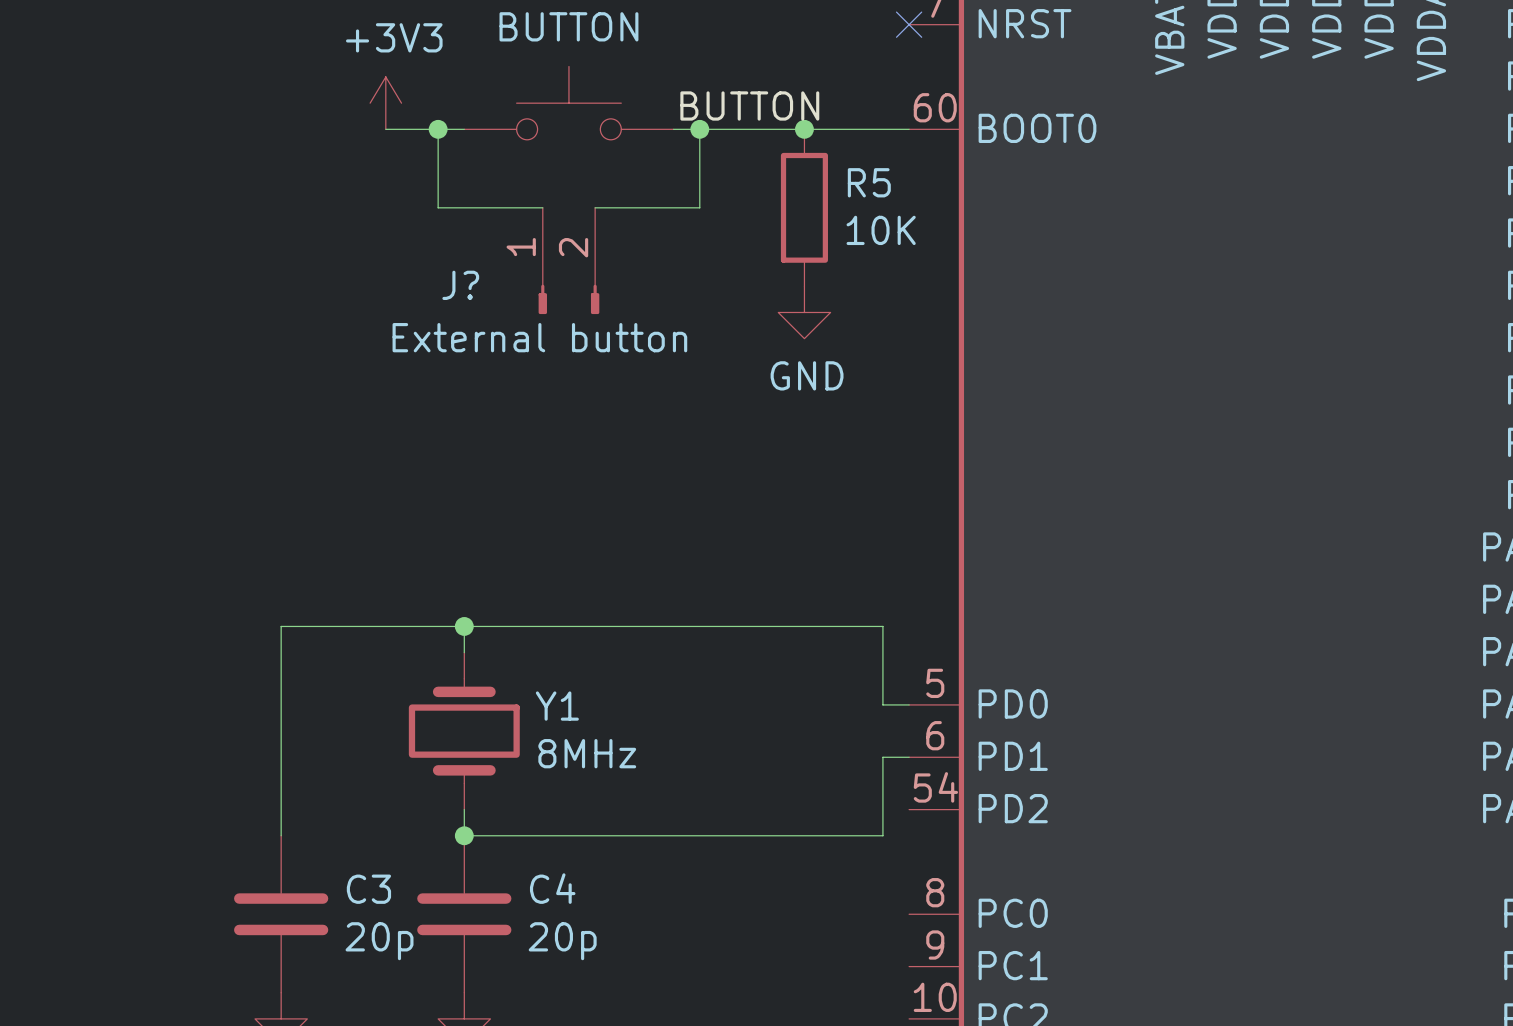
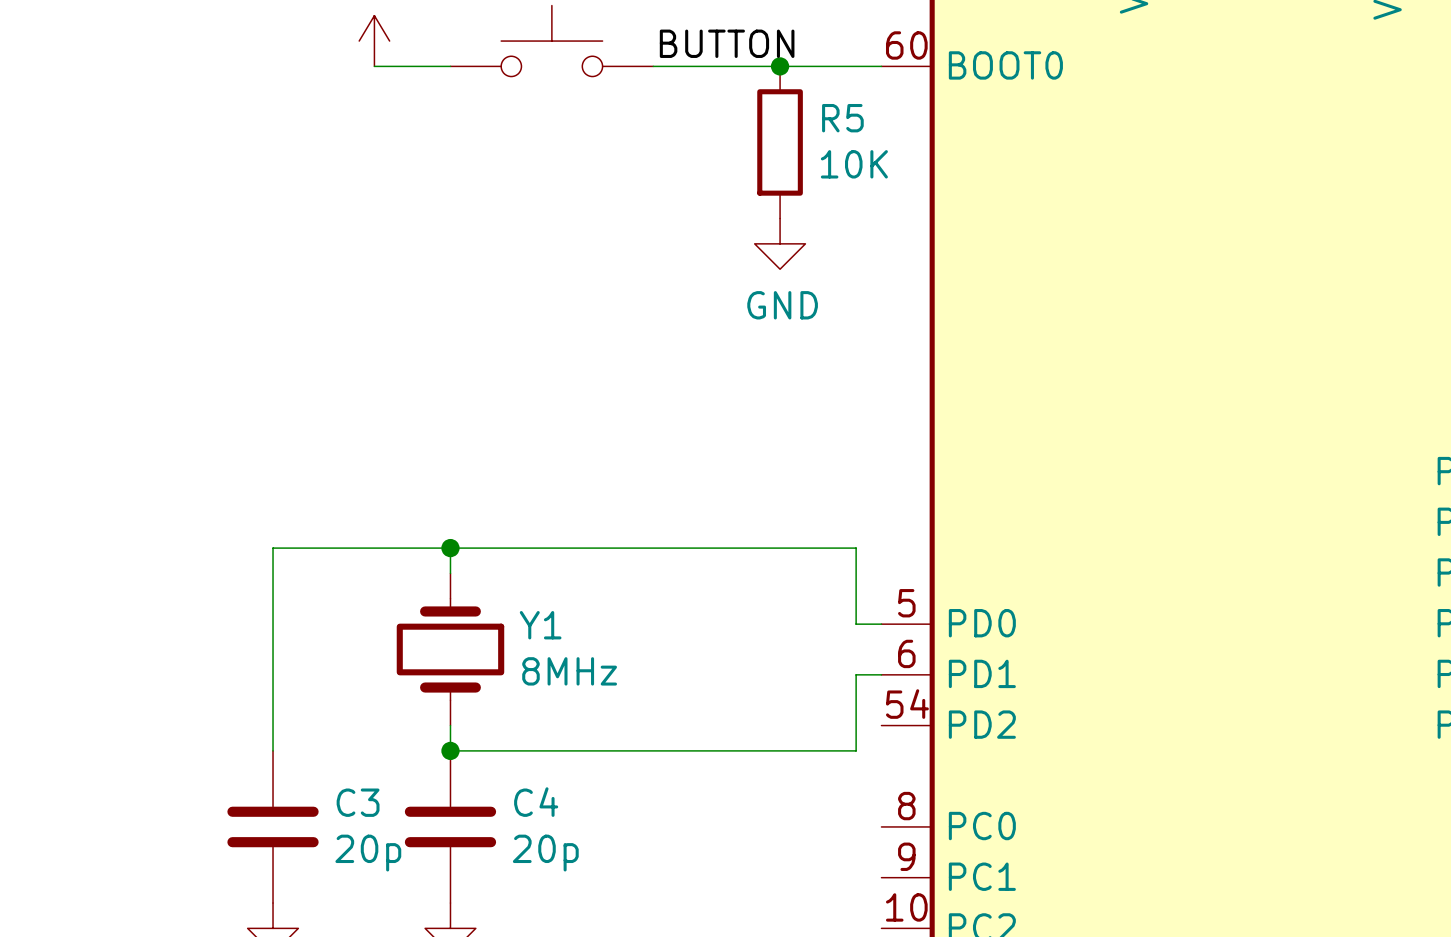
wire: (438, 129) (438, 207) (542, 207) -> none
junction: (438, 129) -> none
wire: (699, 129) (699, 207) (595, 207) -> none
junction: (699, 129) -> none
J?: External button (568, 260) -> none

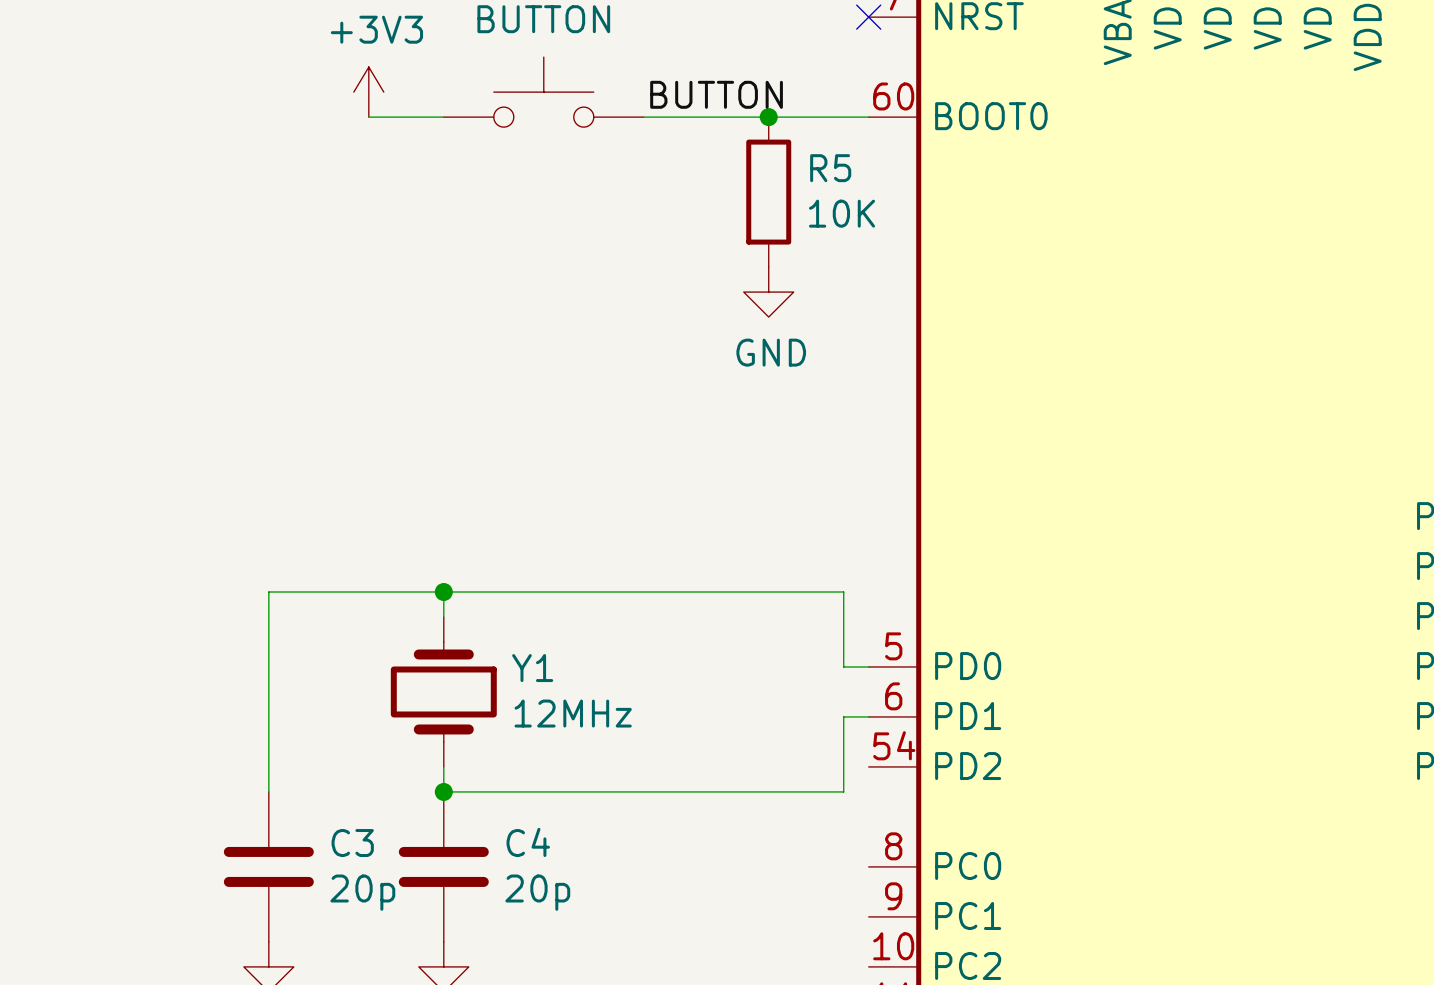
Y1 value: 8MHz (569, 671) -> 12MHz (573, 713)

